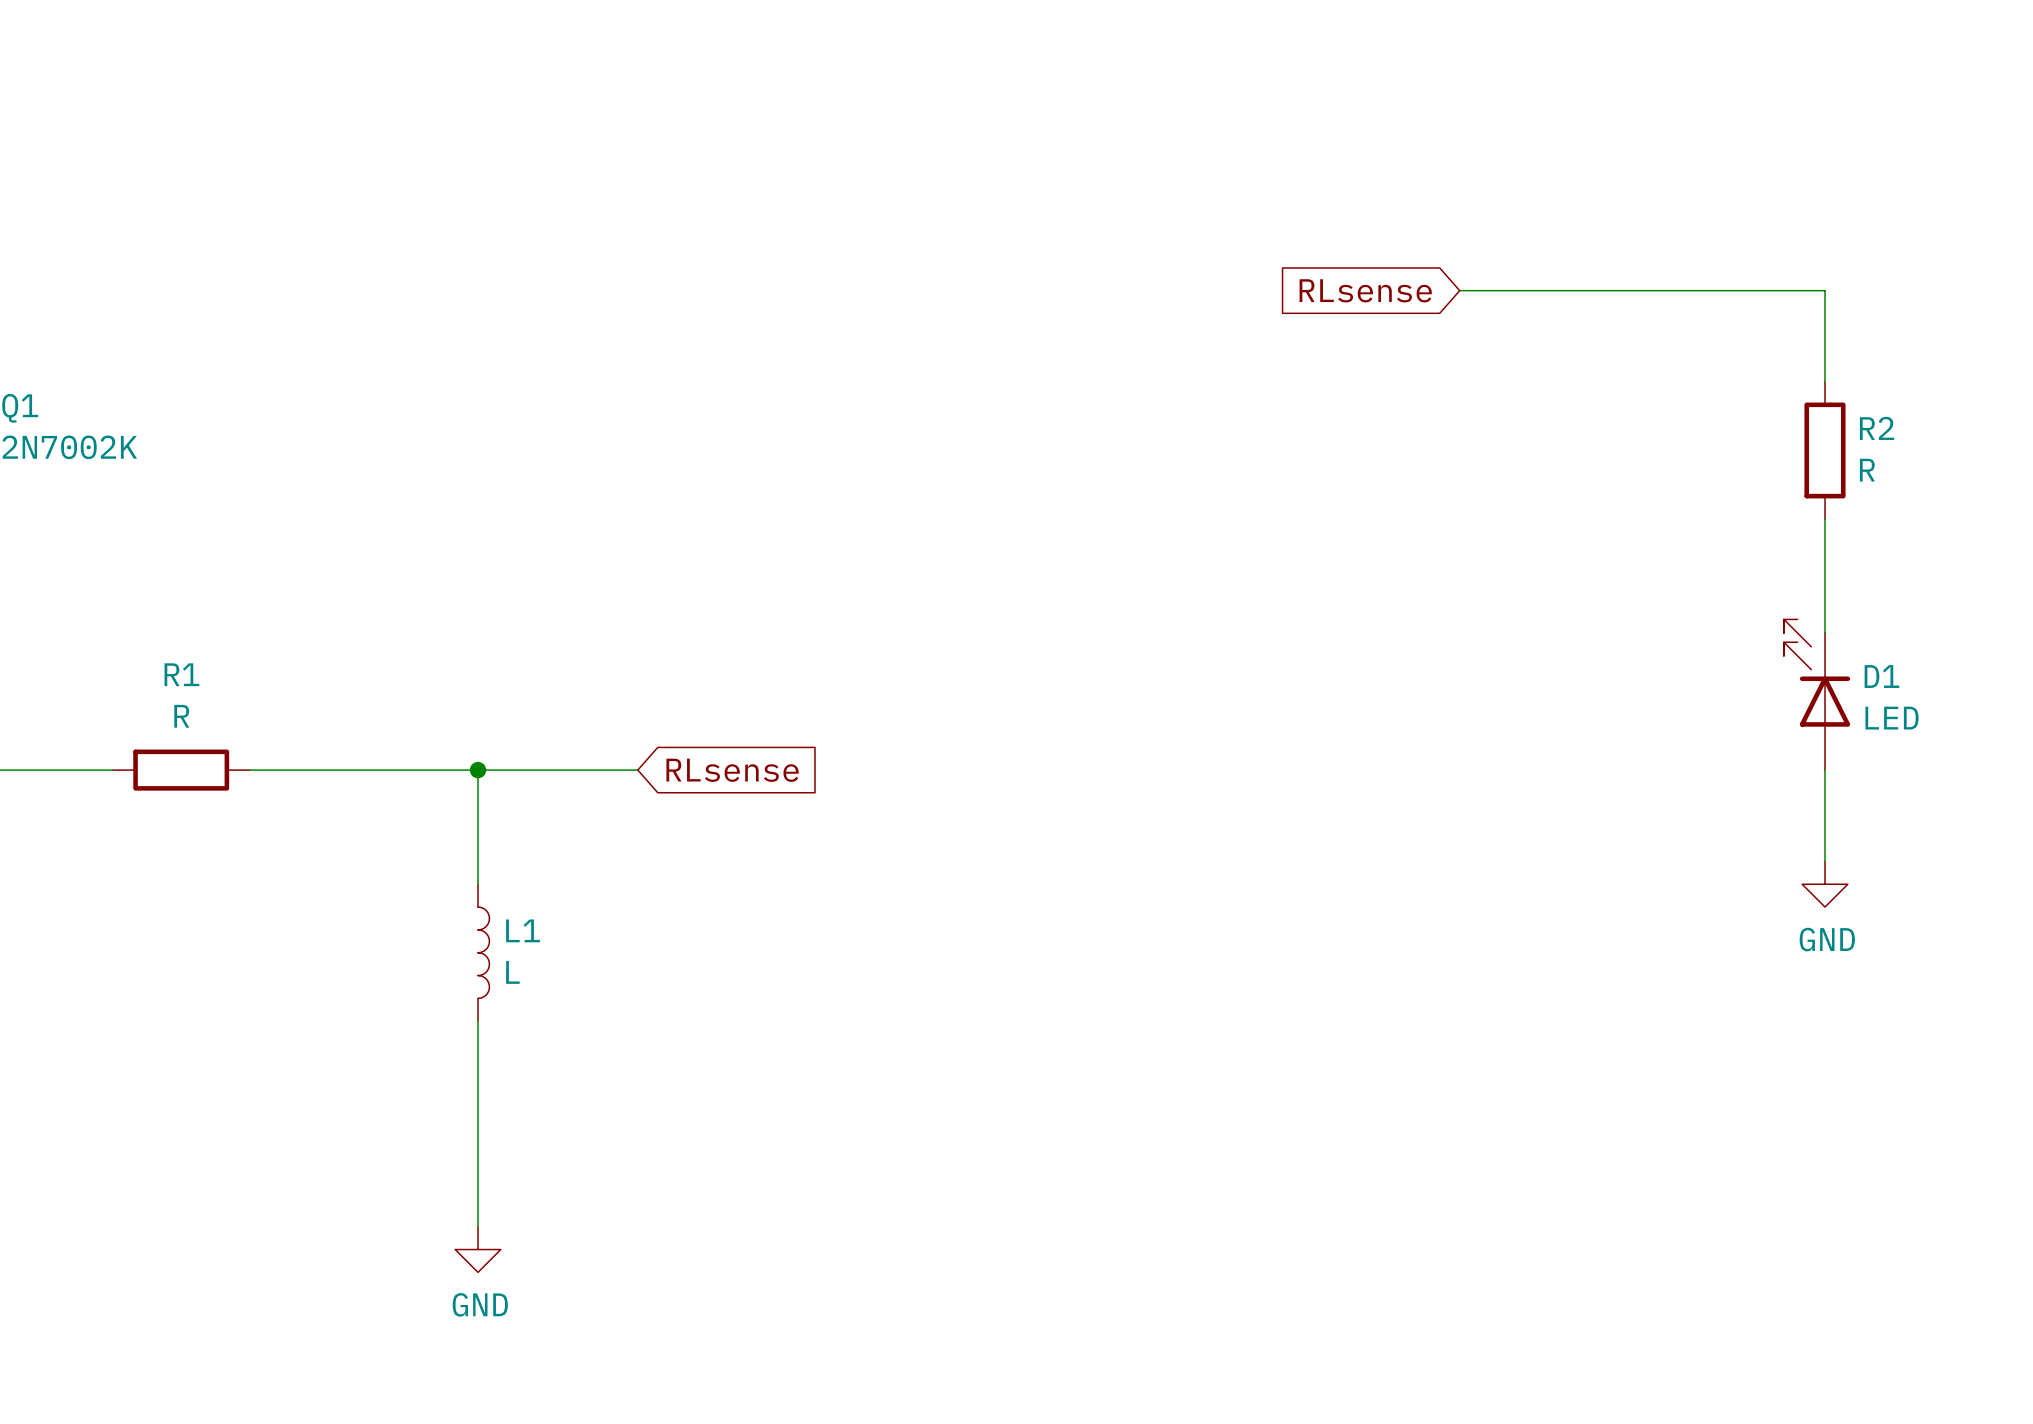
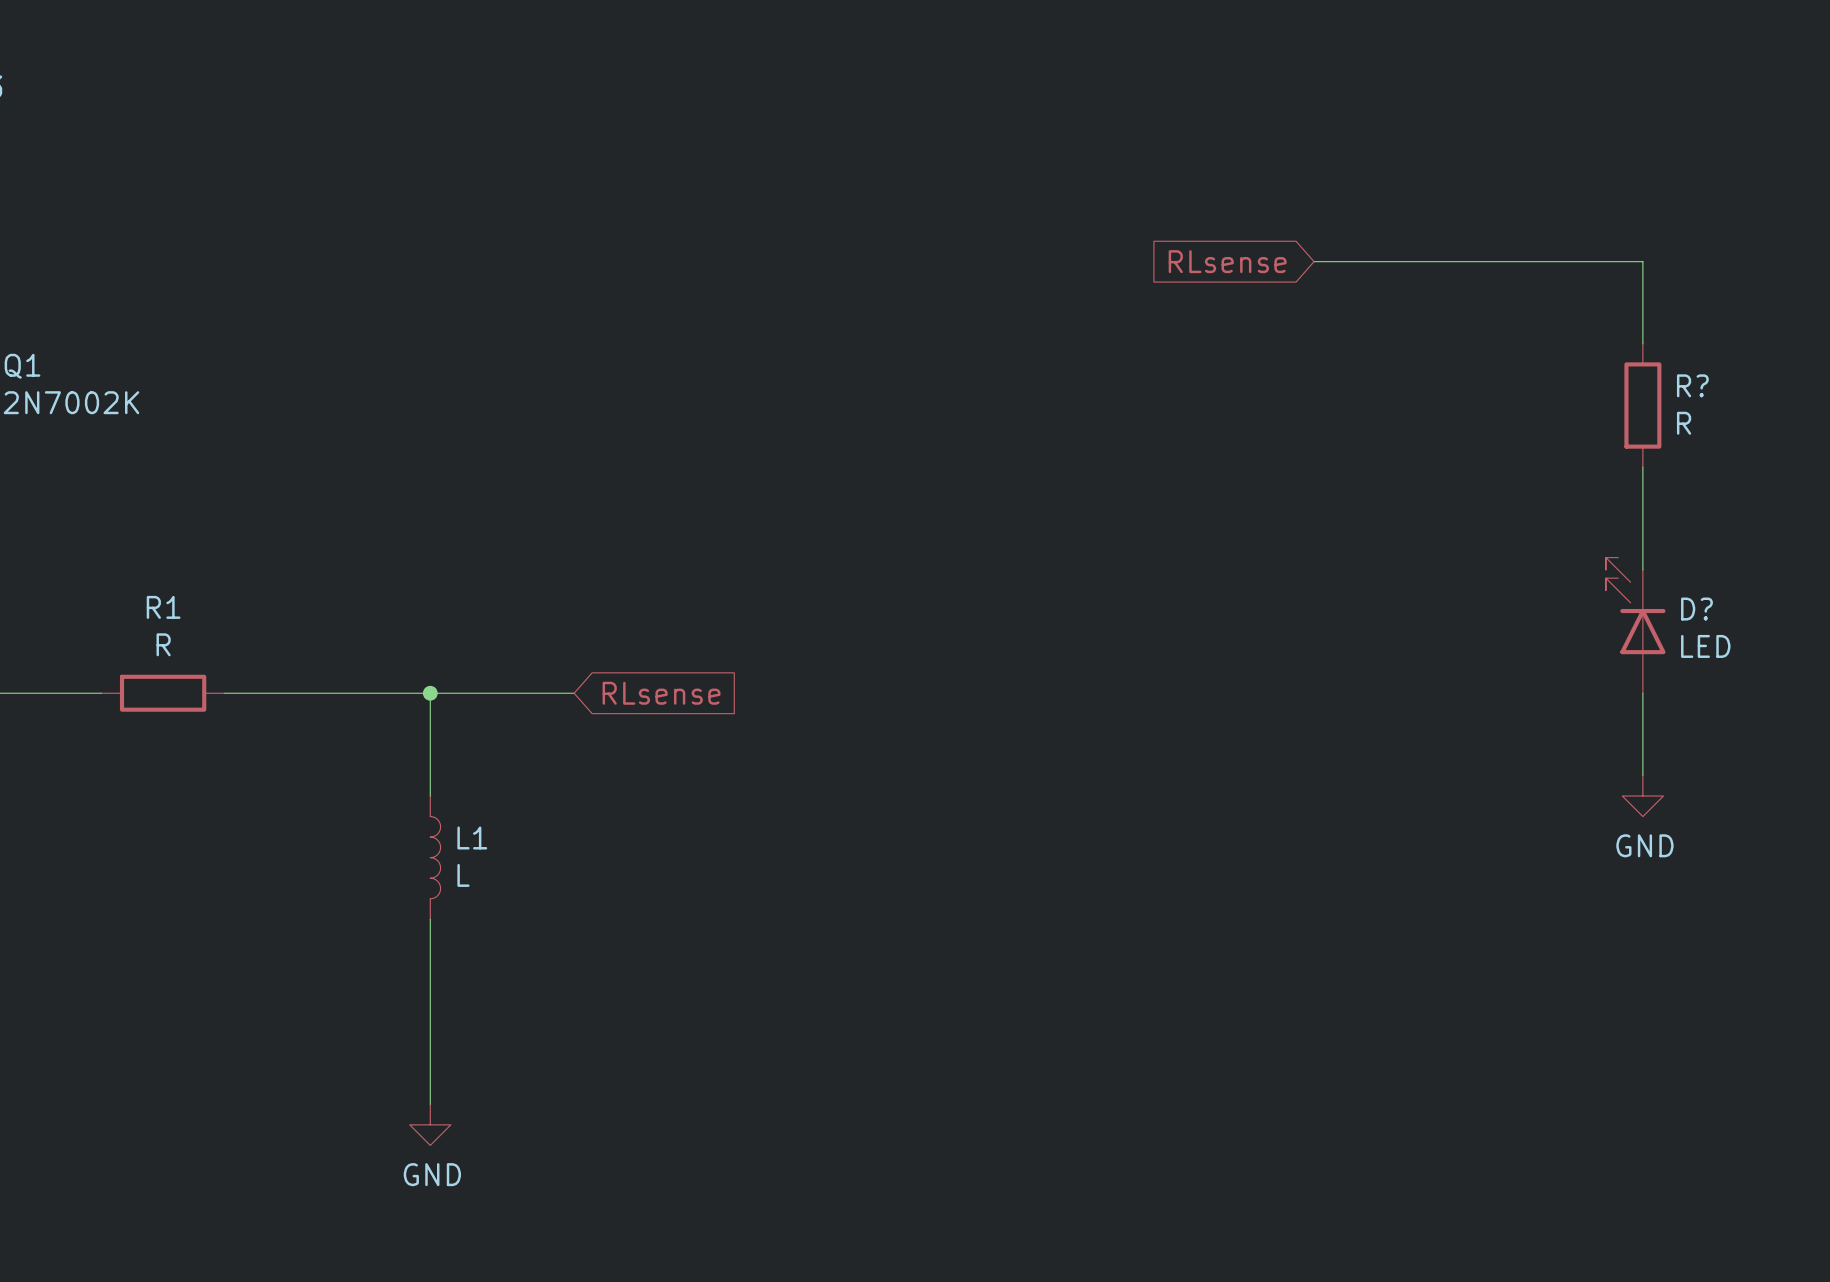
R2 name: R2 (1877, 428) -> R? (1692, 385)
D1 name: D1 (1881, 676) -> D? (1696, 609)

